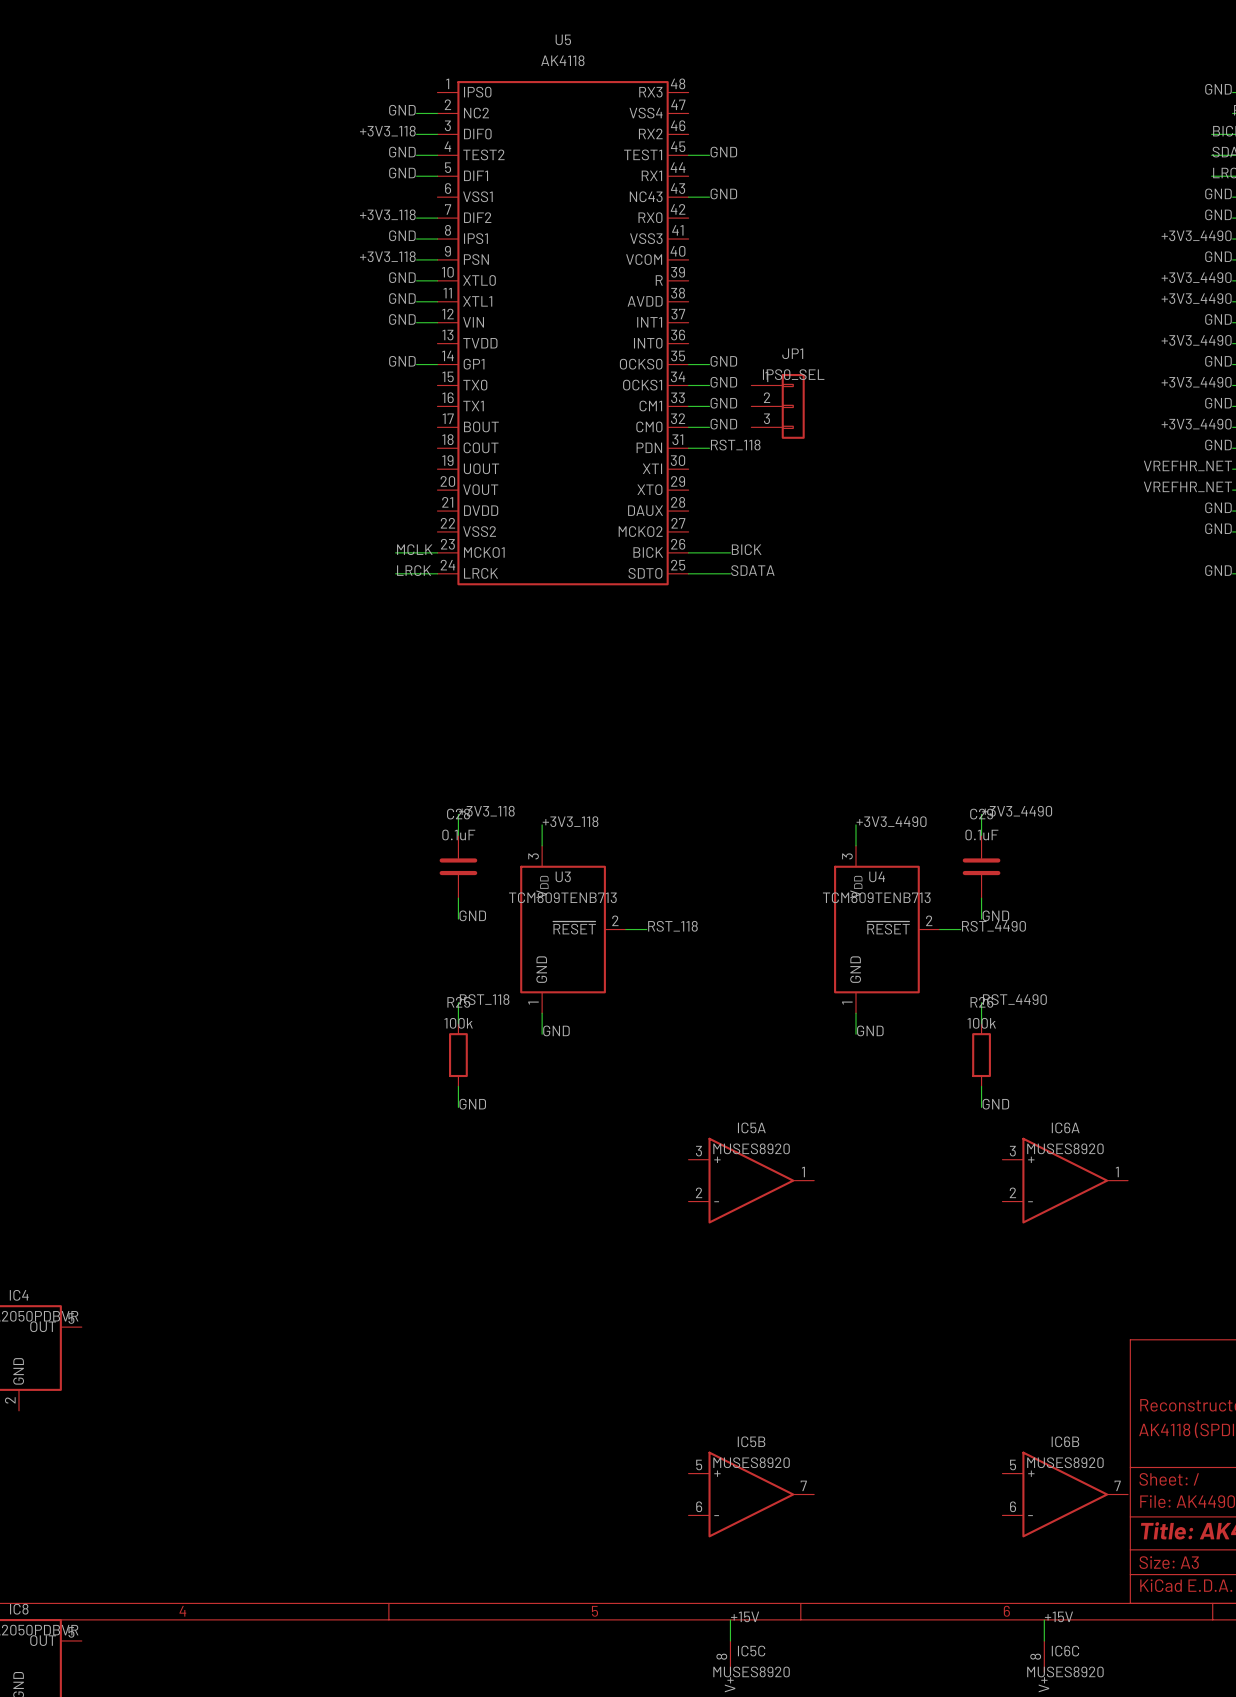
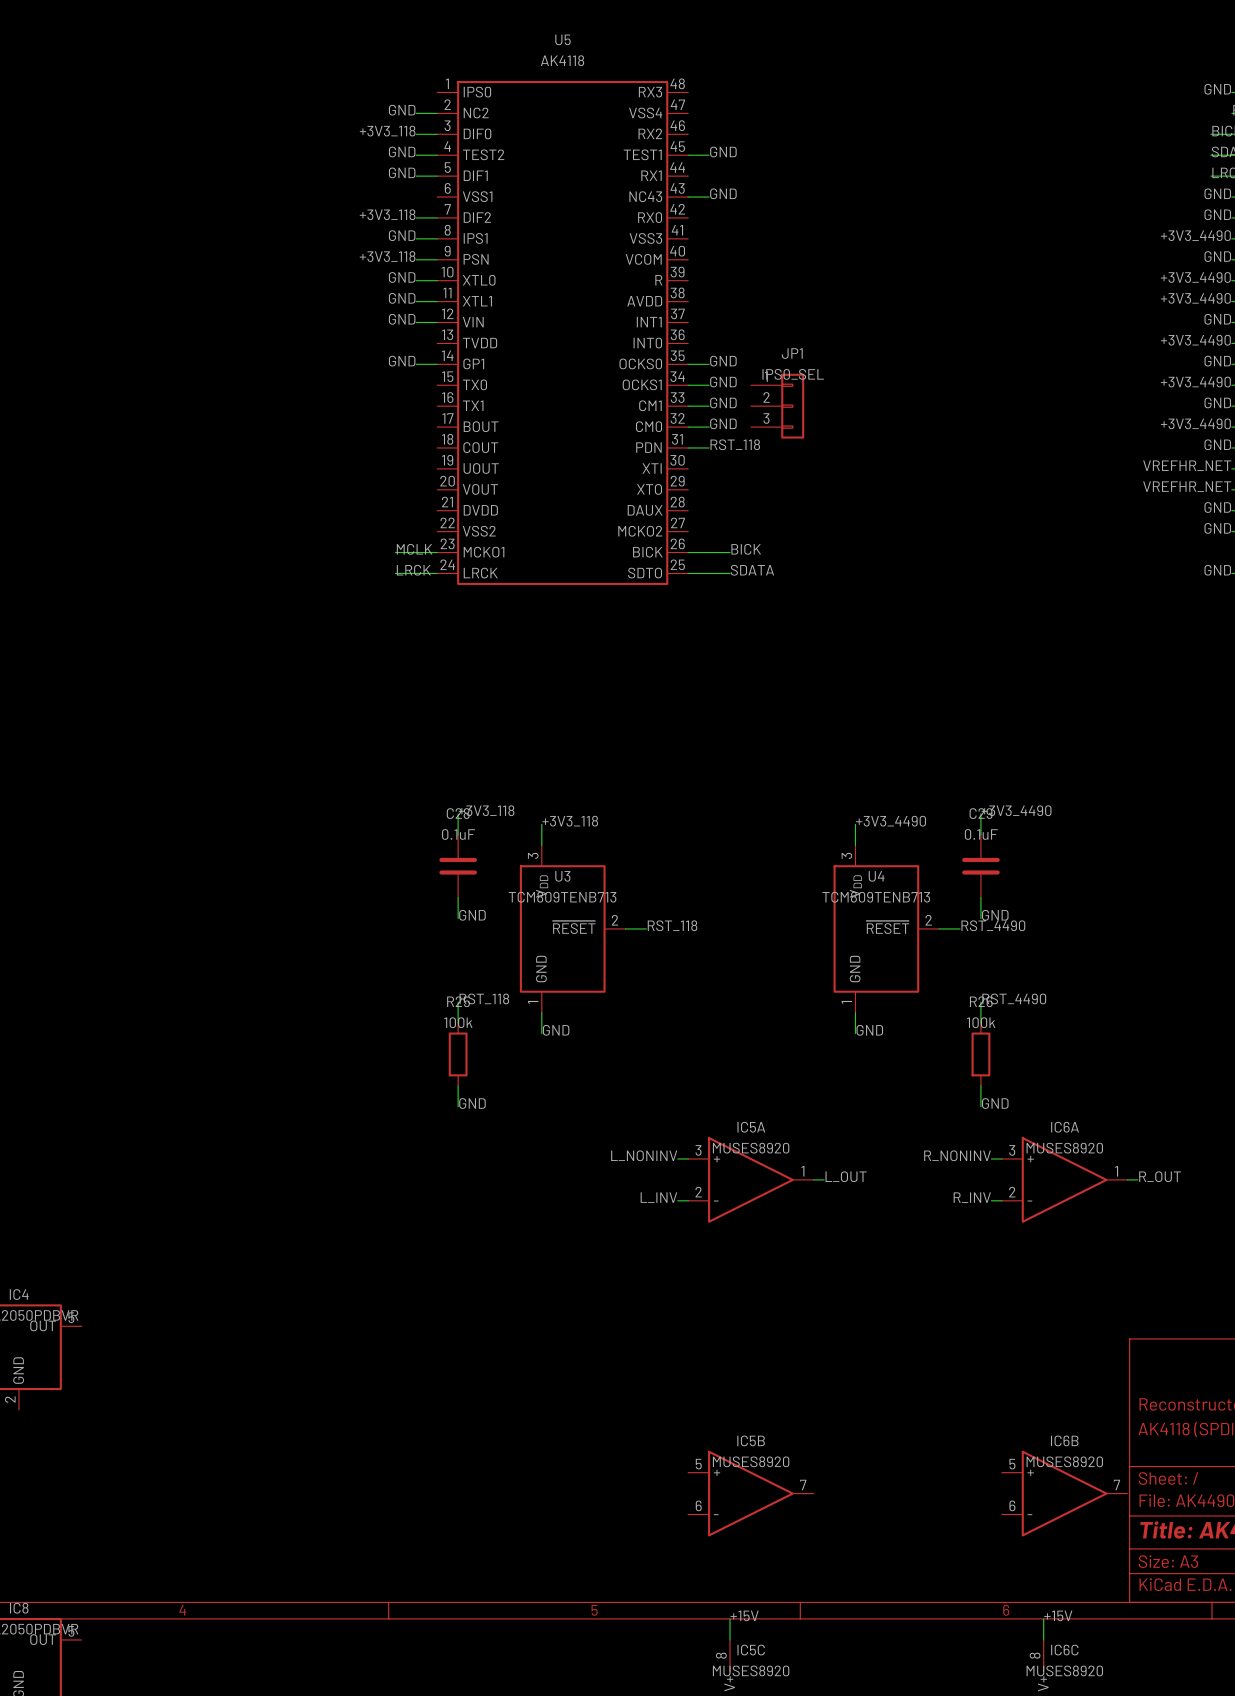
label: none -> L_NONINV (644, 1155)
label: none -> R_NONINV (957, 1155)
wire: none -> (677, 1159) (688, 1159)
wire: none -> (991, 1159) (1001, 1159)
label: none -> L_OUT (846, 1176)
label: none -> R_OUT (1160, 1176)
wire: none -> (813, 1179) (824, 1179)
wire: none -> (1127, 1179) (1137, 1179)
label: none -> L_INV (658, 1197)
label: none -> R_INV (972, 1197)
wire: none -> (677, 1200) (688, 1200)
wire: none -> (991, 1200) (1001, 1200)

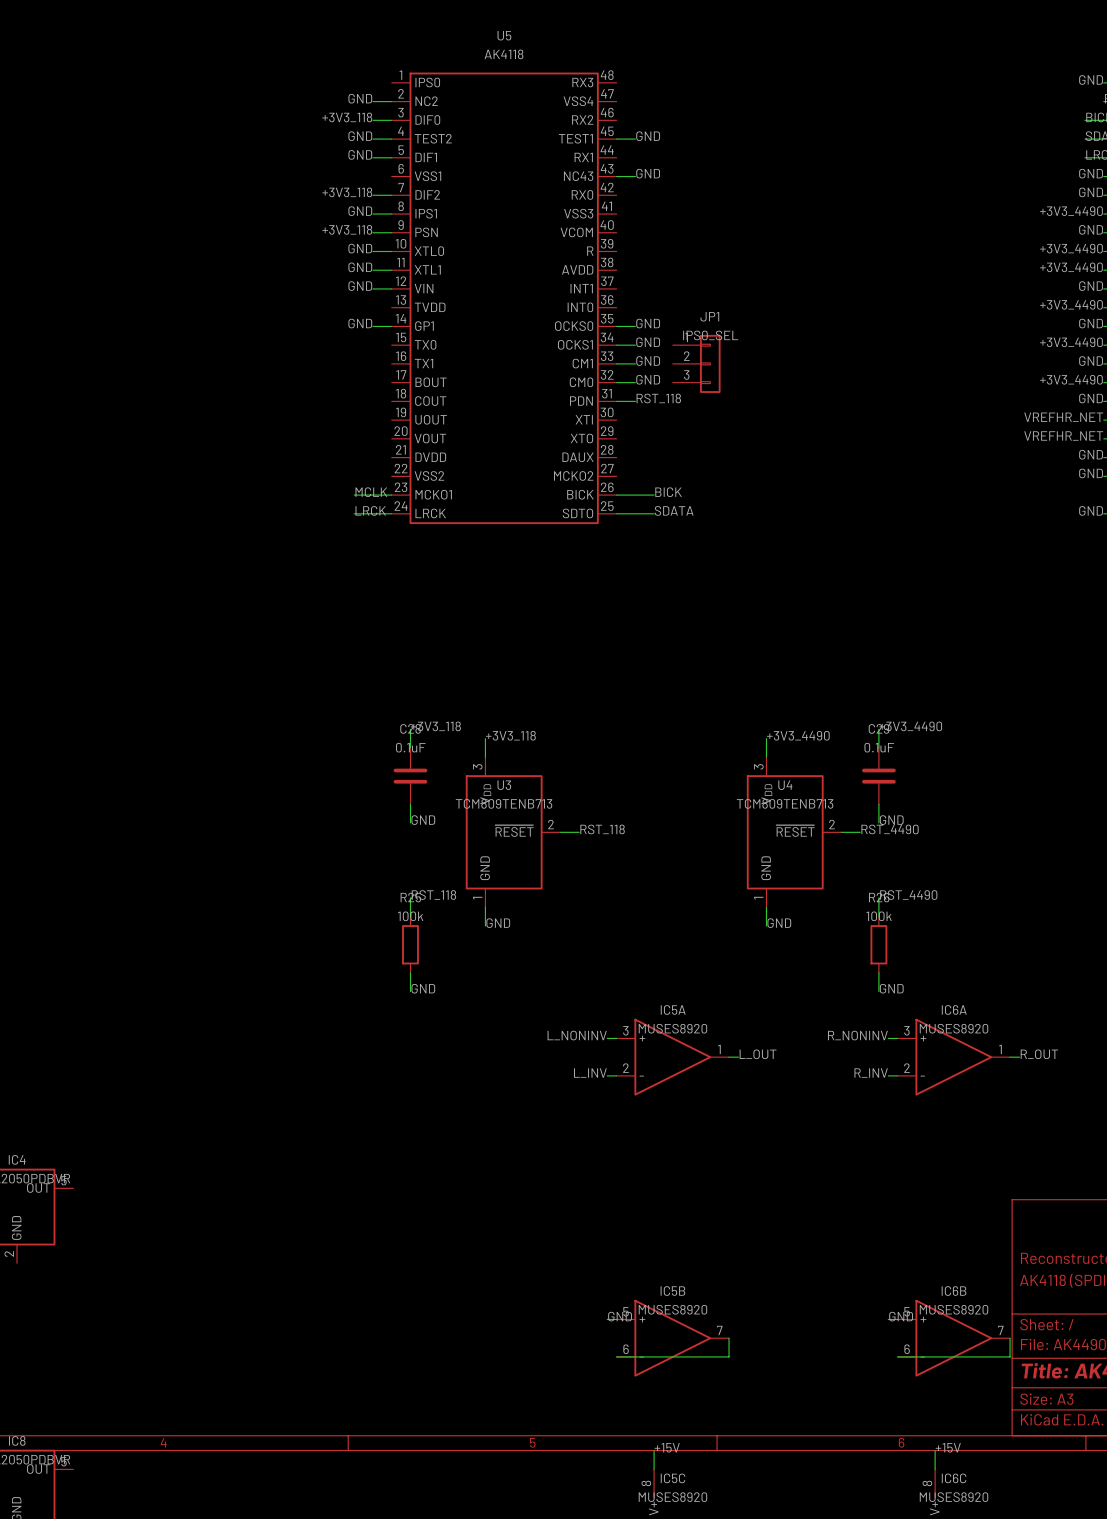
label: none -> GND (620, 1316)
label: none -> GND (901, 1316)
wire: none -> (607, 1319) (616, 1319)
wire: none -> (888, 1319) (897, 1319)
wire: none -> (729, 1338) (729, 1356) (616, 1356)
wire: none -> (1010, 1338) (1010, 1356) (897, 1356)

